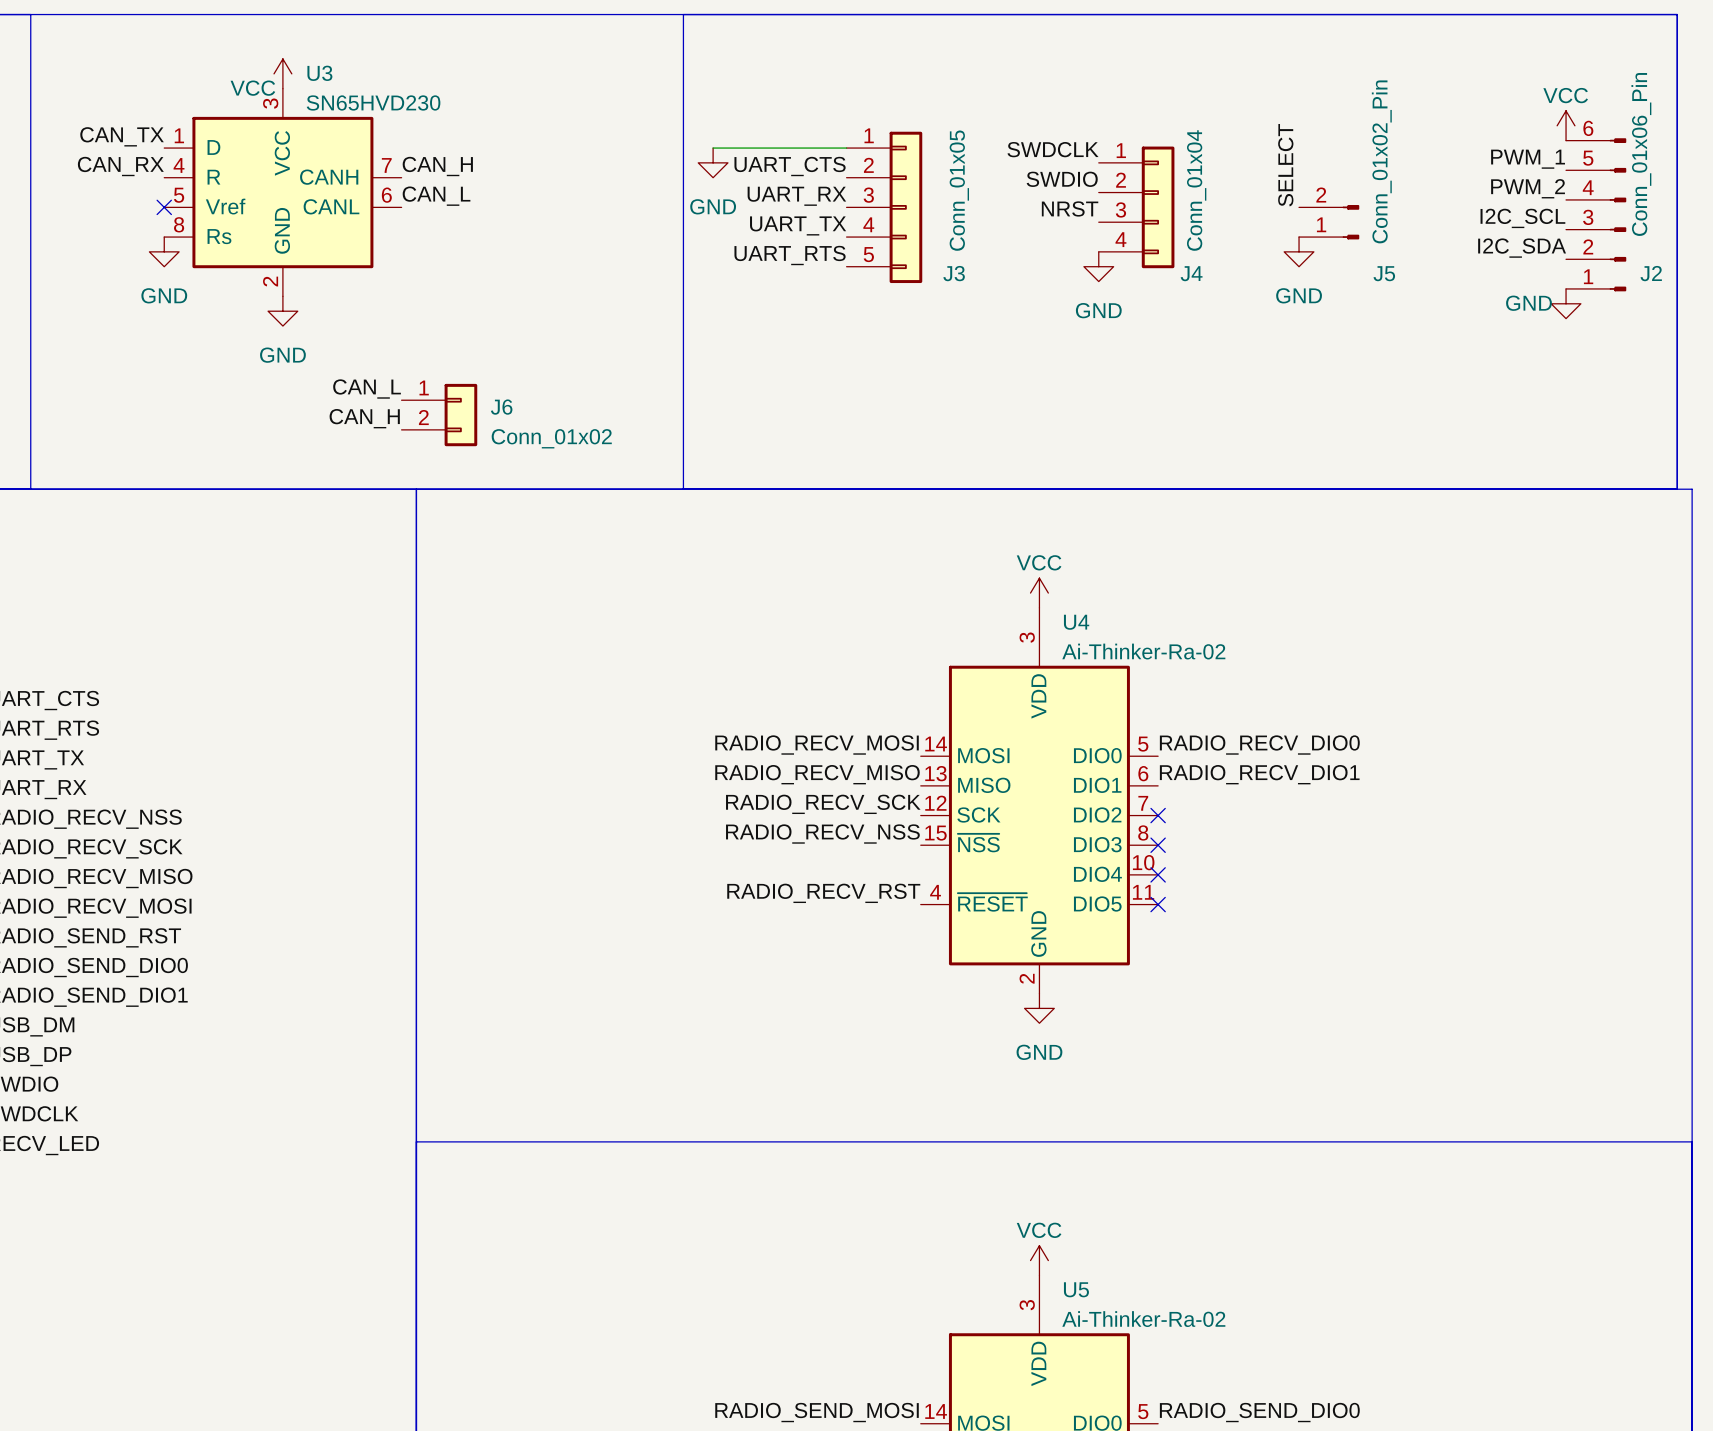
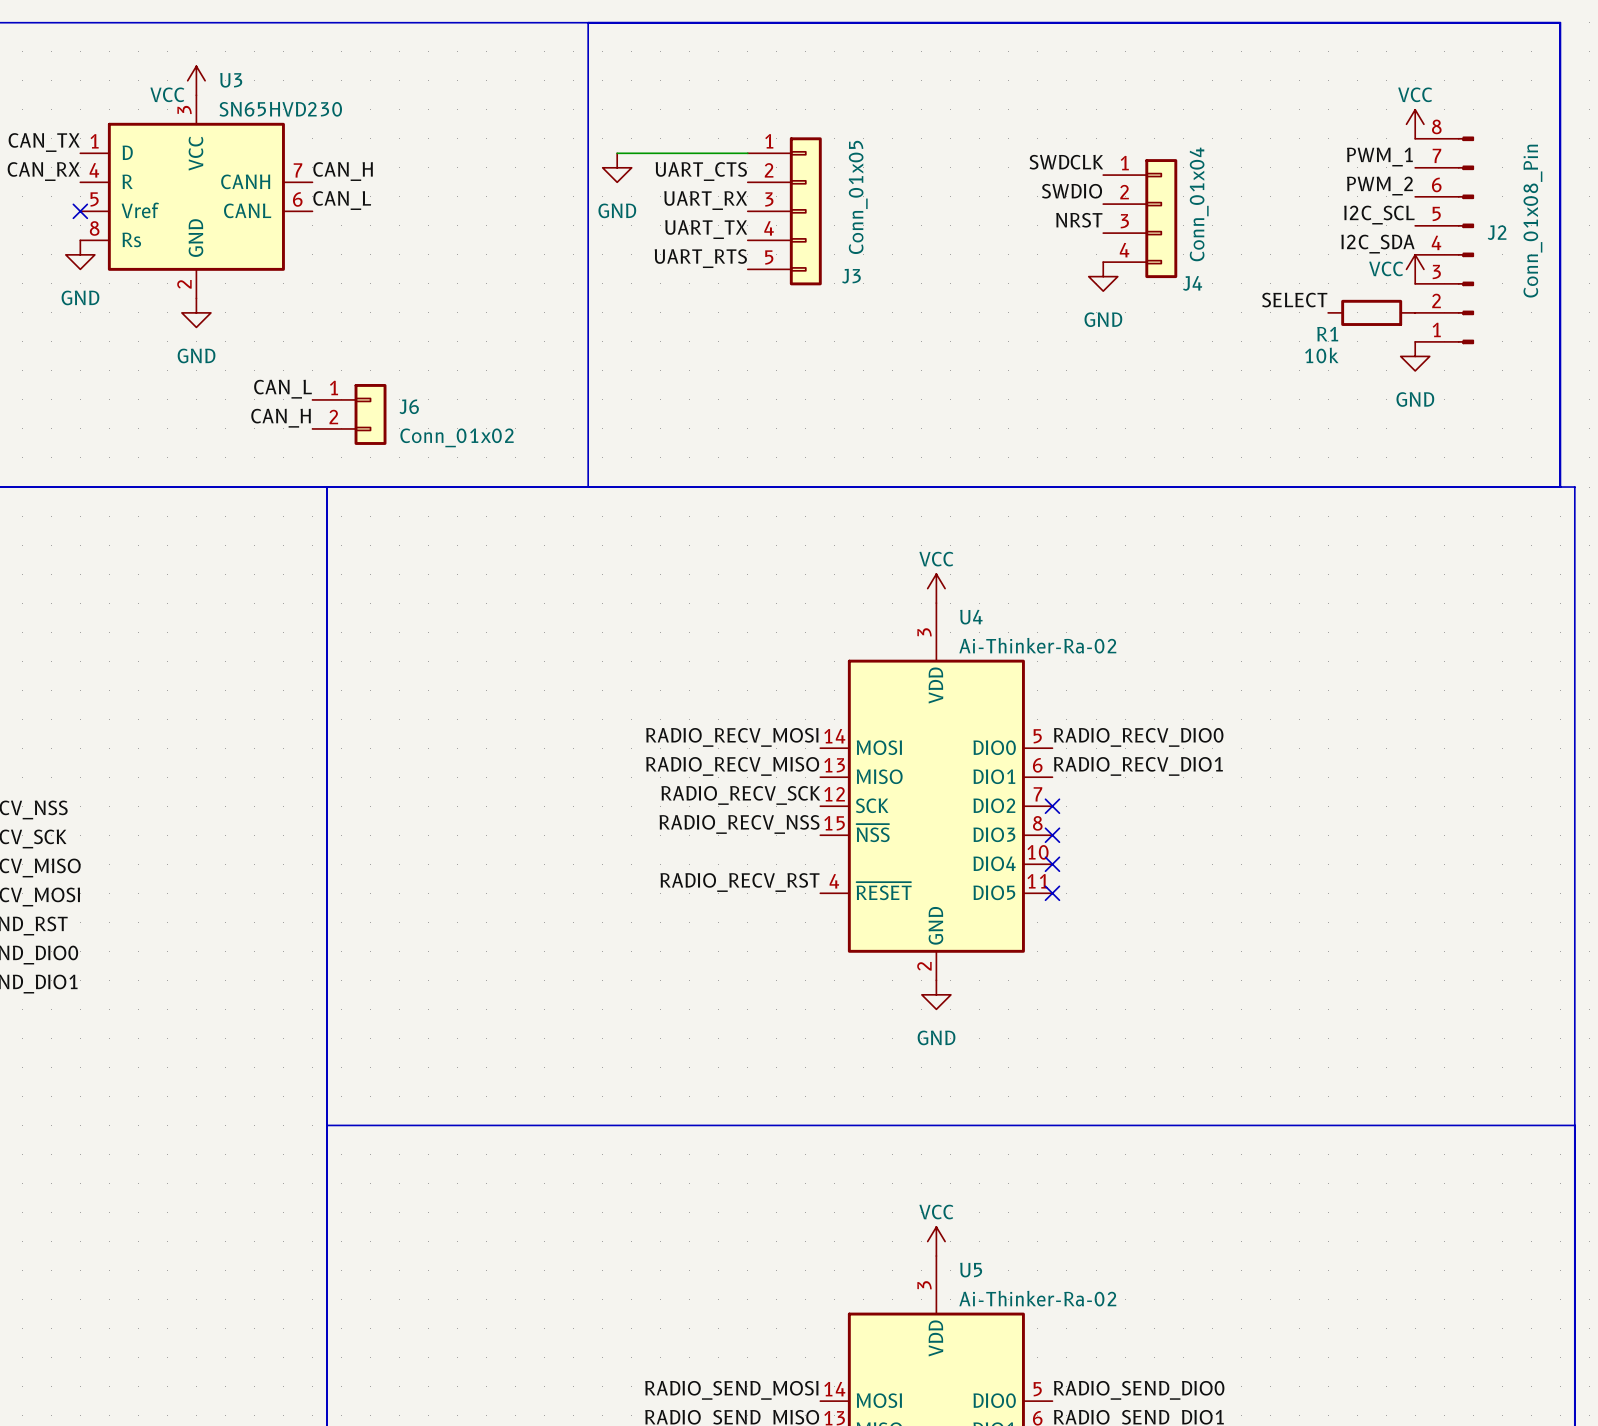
power symbol position: VCC (1566, 125) -> VCC (1415, 124)
J2 symbol: [1566, 138, 1627, 292] -> [1415, 136, 1475, 345]
label position: SWDCLK (1053, 149) -> SWDCLK (1066, 162)
J2 value: Conn_01x06_Pin (1641, 154) -> Conn_01x08_Pin (1532, 221)
label position: PWM_1 (1528, 159) -> PWM_1 (1379, 157)
label rotation: 0° (1285, 165) -> 90° clockwise (1294, 300)
label position: SELECT (1285, 165) -> SELECT (1294, 300)
label position: SWDIO (1062, 179) -> SWDIO (1072, 191)
label position: PWM_2 (1528, 188) -> PWM_2 (1379, 186)
J4 position: (1136, 207) -> (1140, 218)
label position: NRST (1070, 208) -> NRST (1079, 220)
label position: I2C_SCL (1522, 218) -> I2C_SCL (1379, 215)
J5: Conn_01x02_Pin (1329, 222) -> none
label position: I2C_SDA (1522, 248) -> I2C_SDA (1377, 244)
power symbol: GND (1299, 251) -> none
power symbol: GND (1098, 266) -> none
power symbol: none -> VCC (1415, 269)
J2 name position: J2 (1651, 273) -> J2 (1497, 232)
power symbol: none -> GND (1103, 276)
power symbol text position: GND (1528, 303) -> GND (1415, 399)
power symbol position: GND (1566, 303) -> GND (1415, 356)
R1: none -> 10k (1371, 312)

